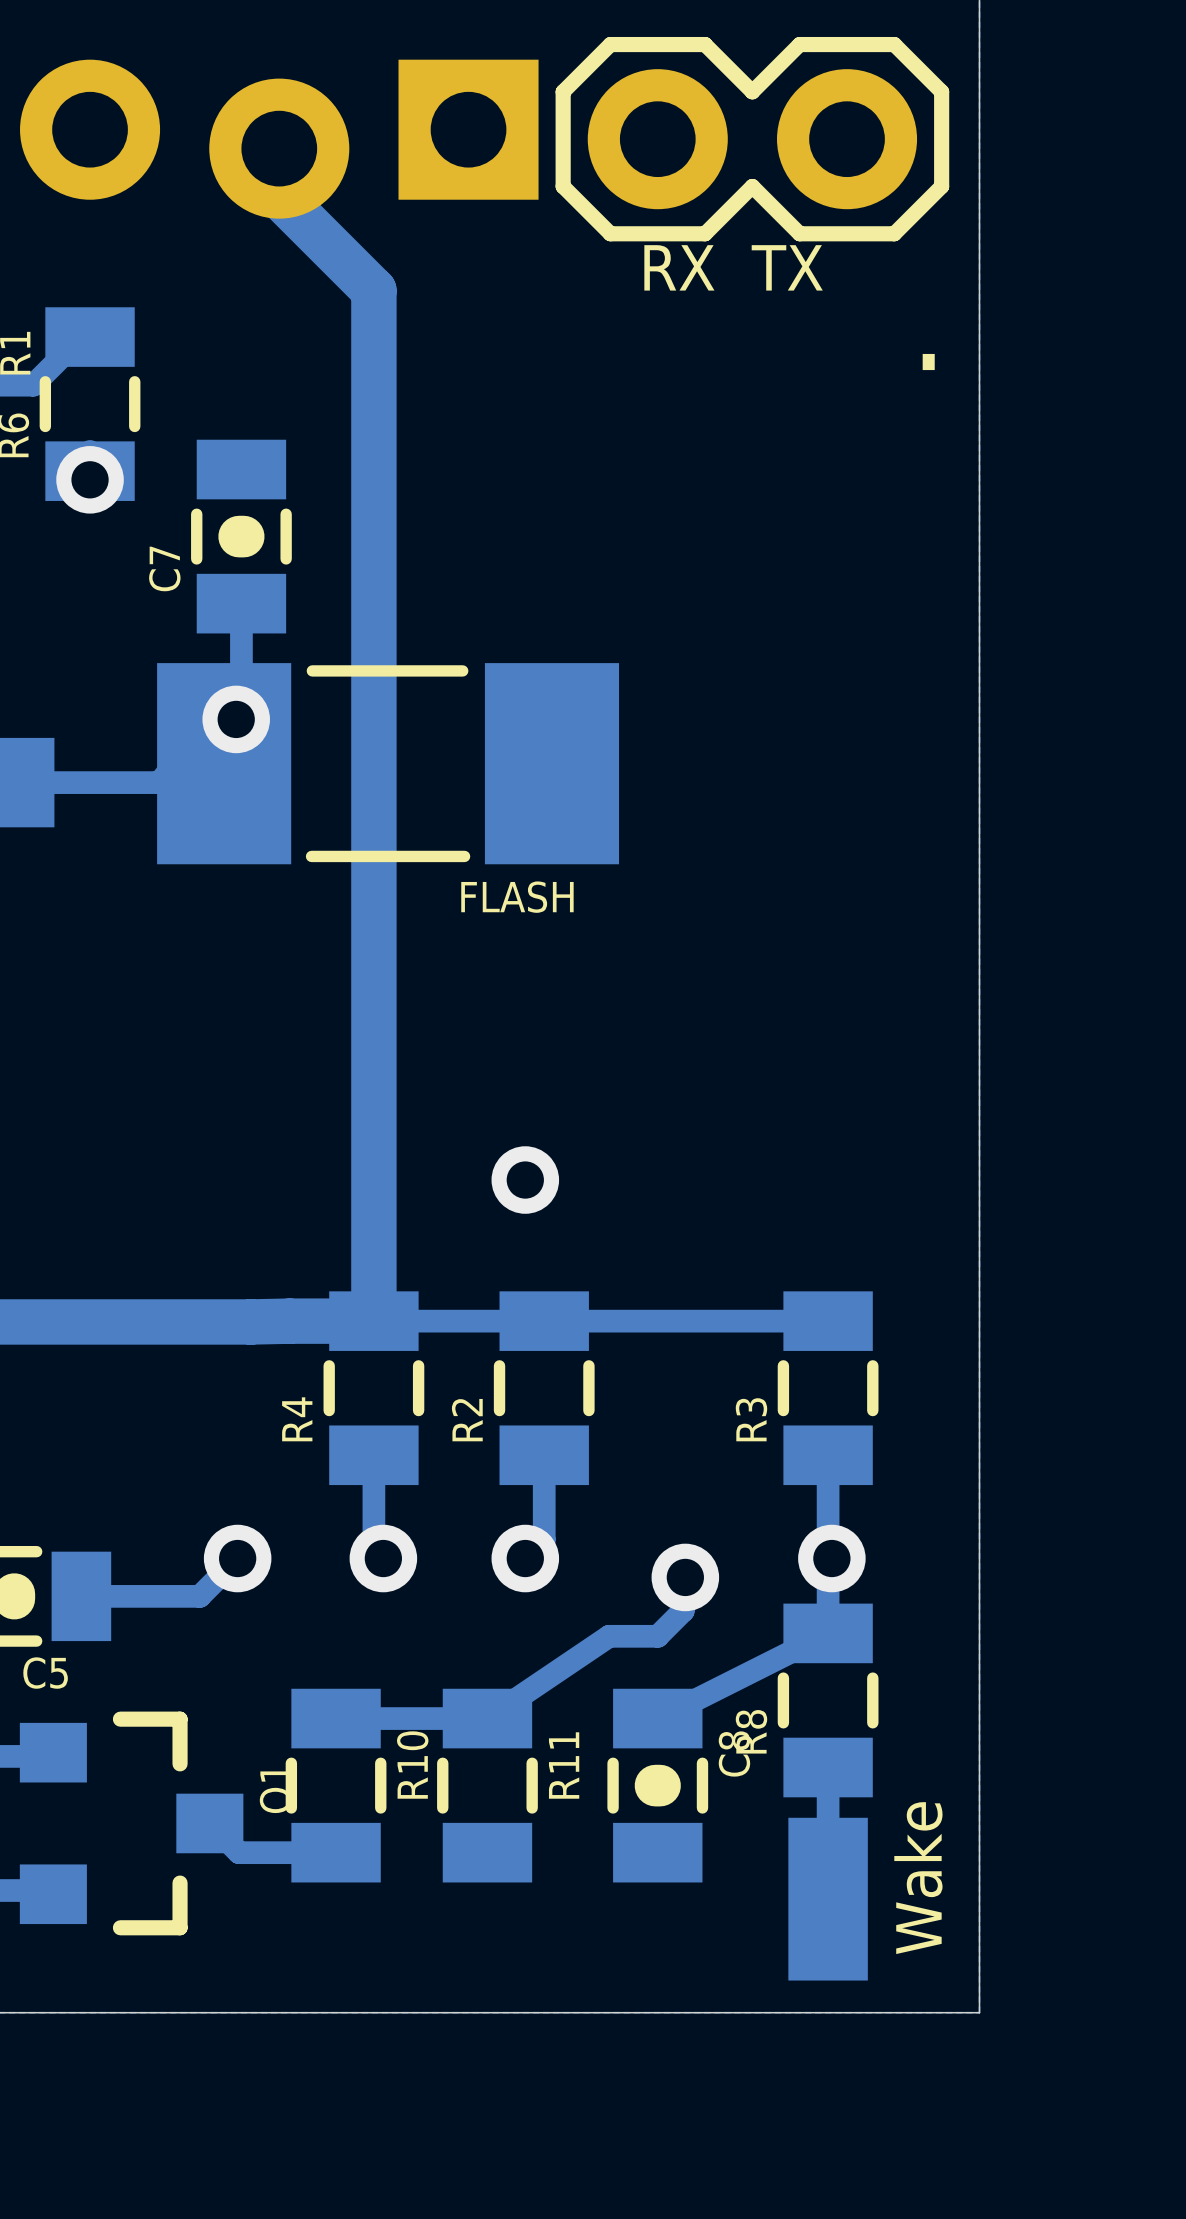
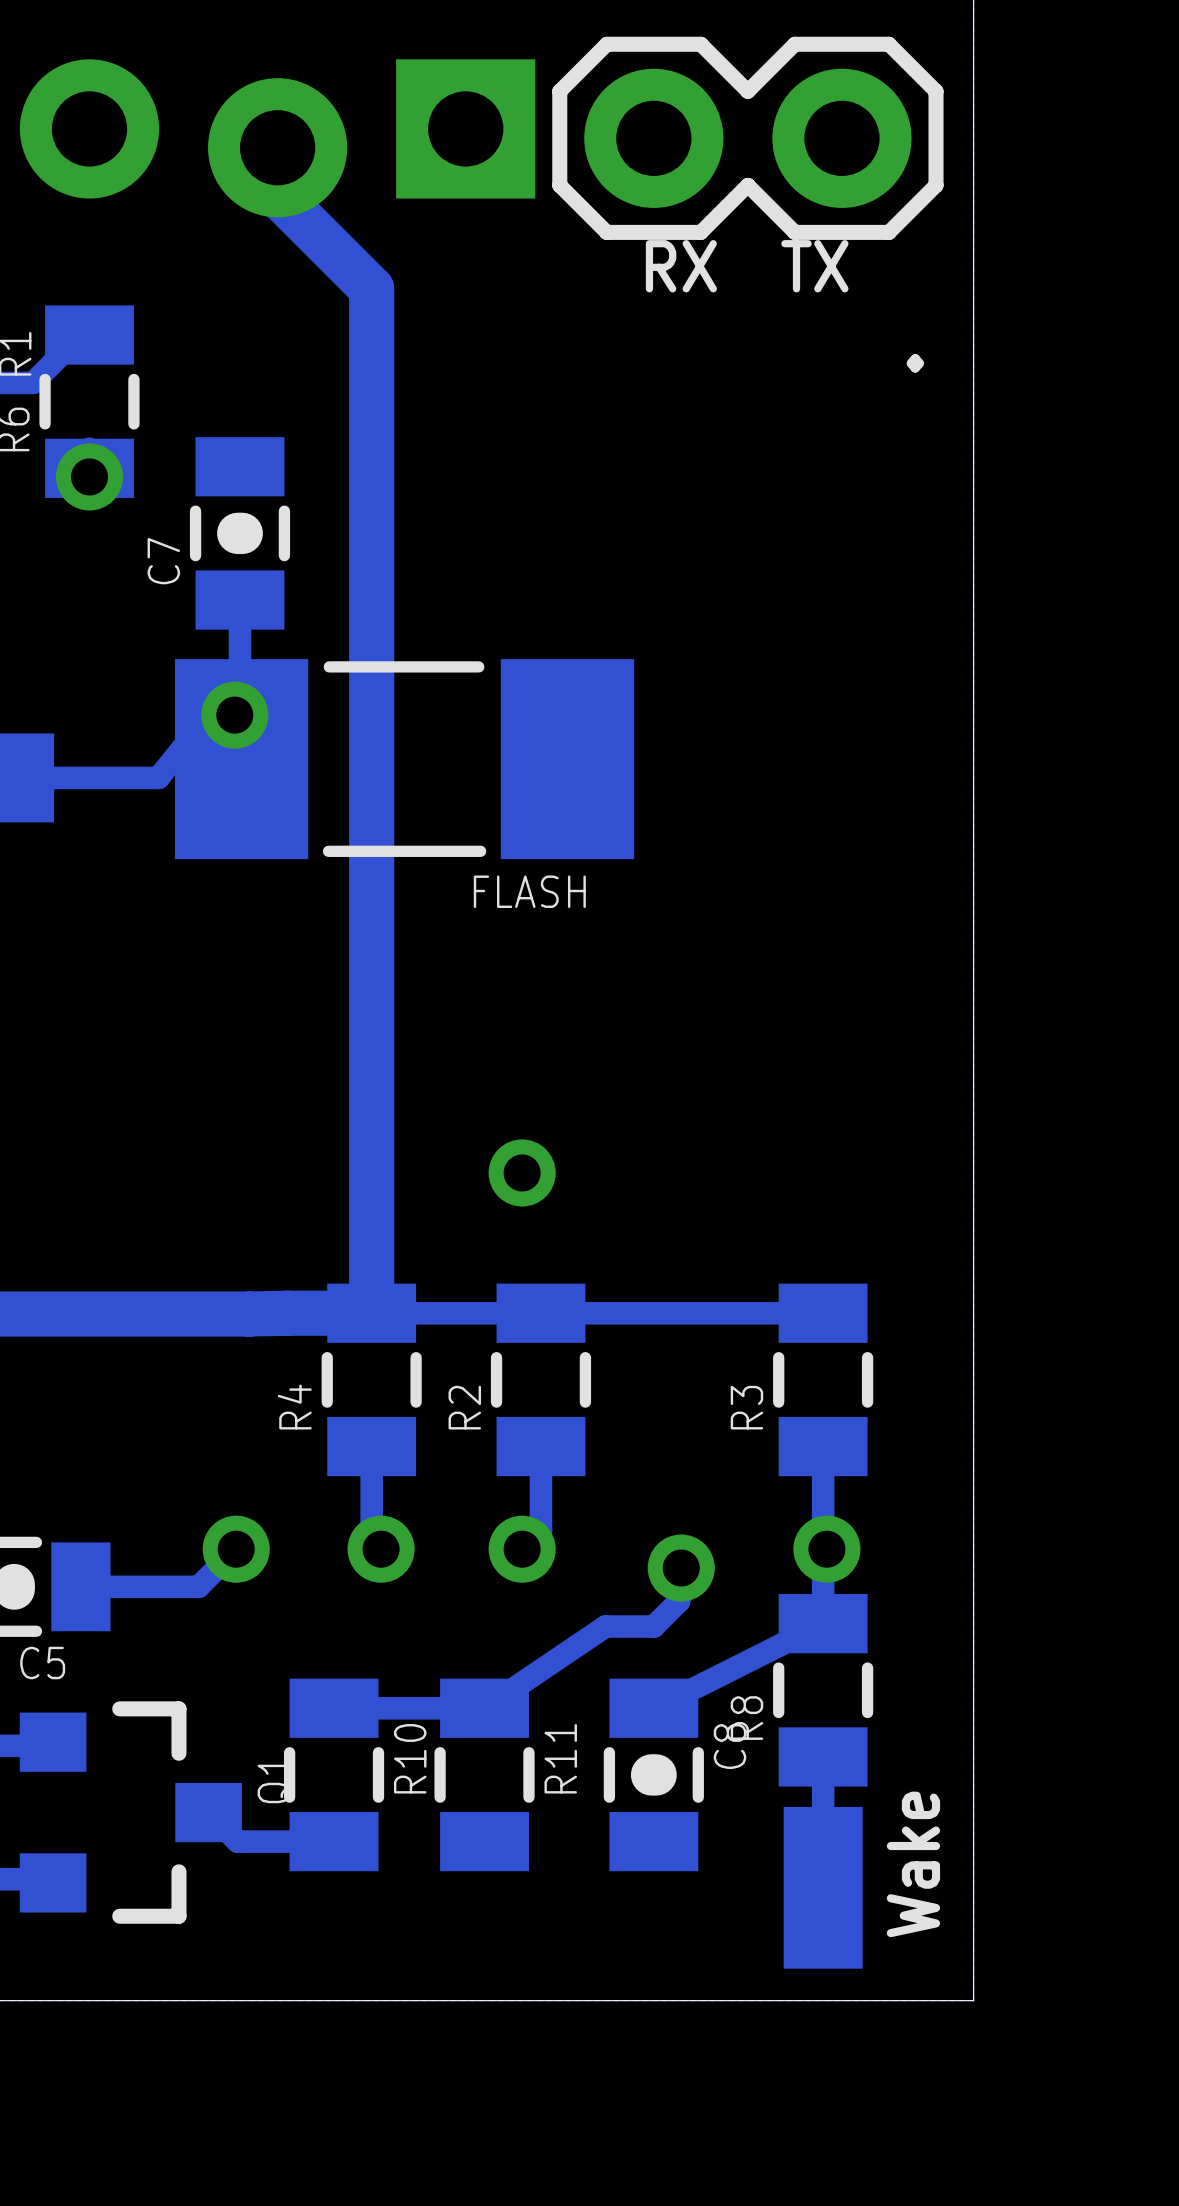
FLASH position: (388, 763) -> (404, 759)

